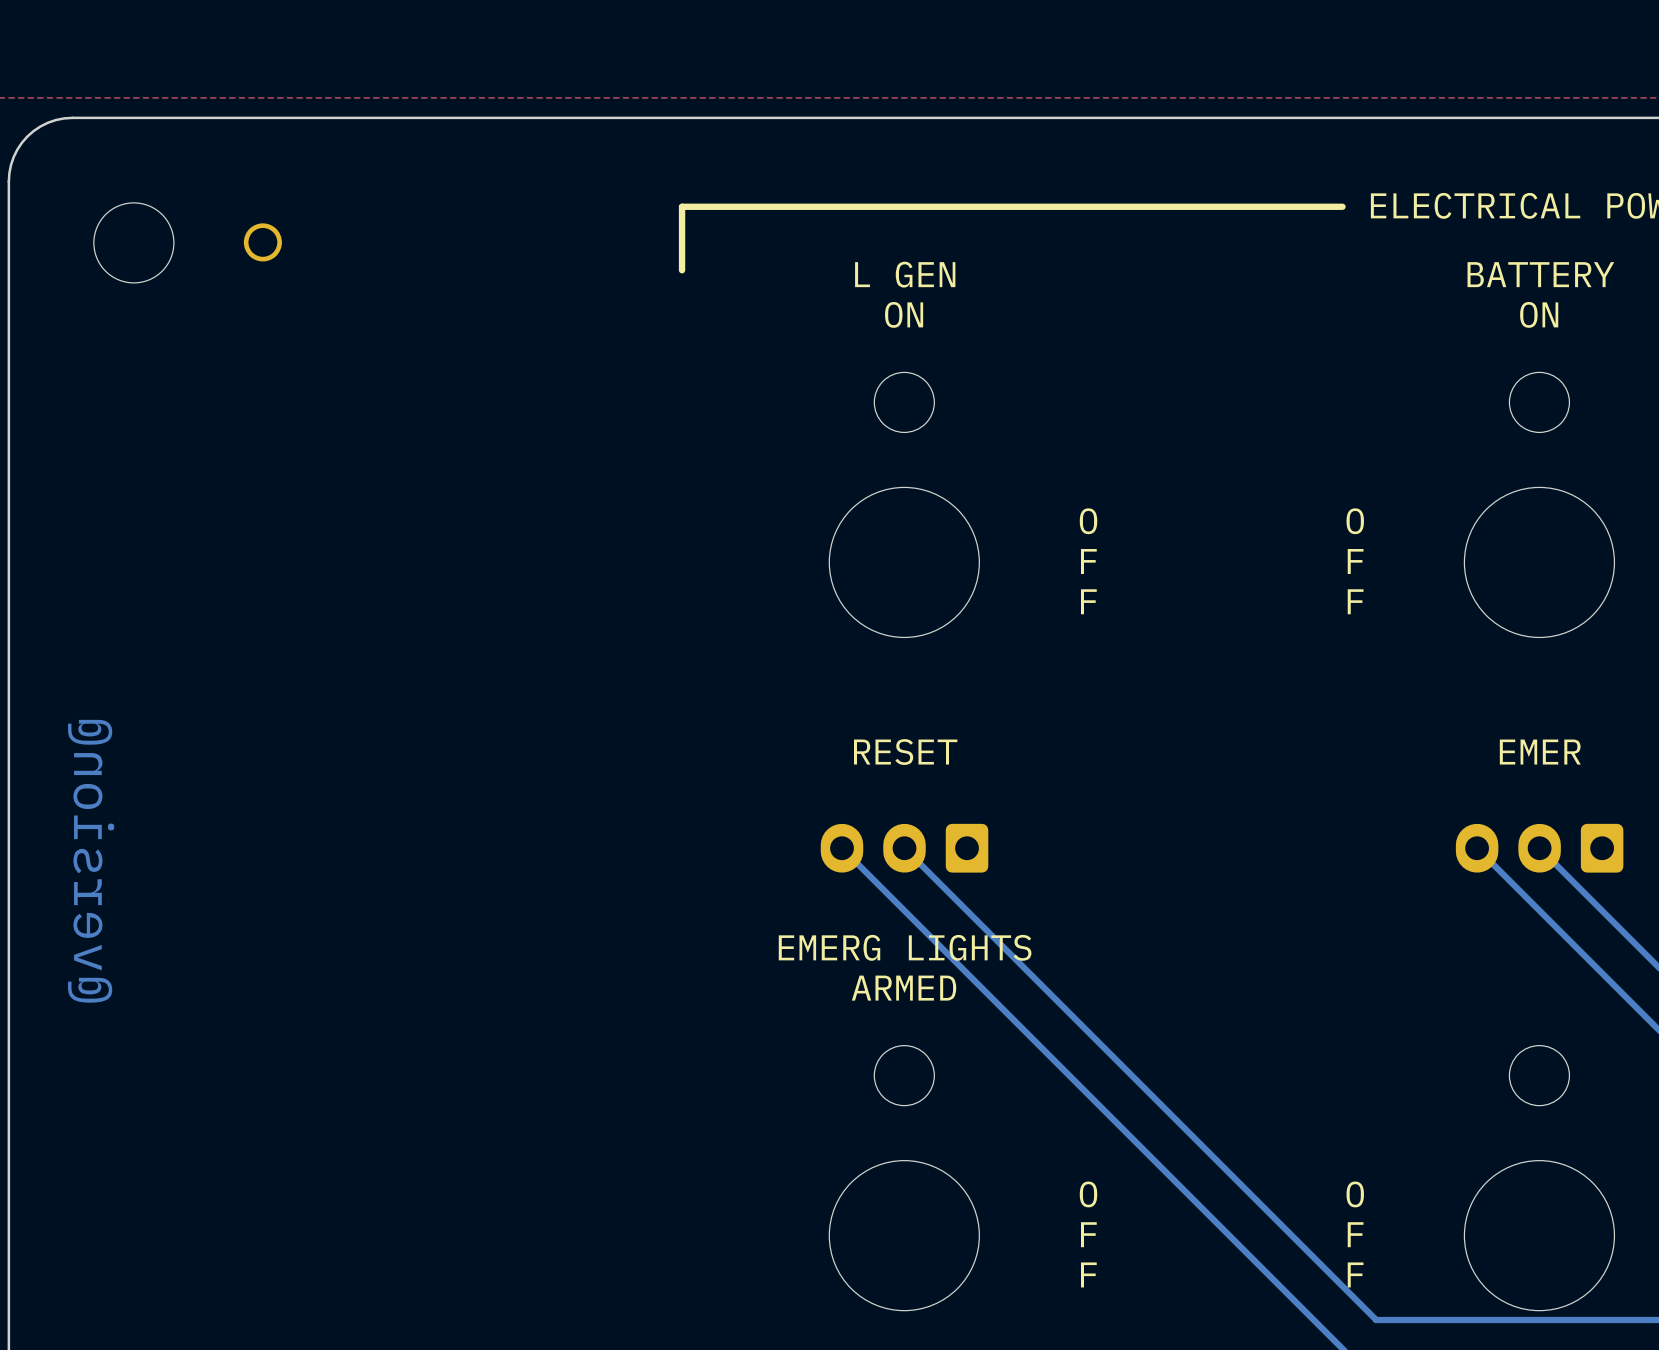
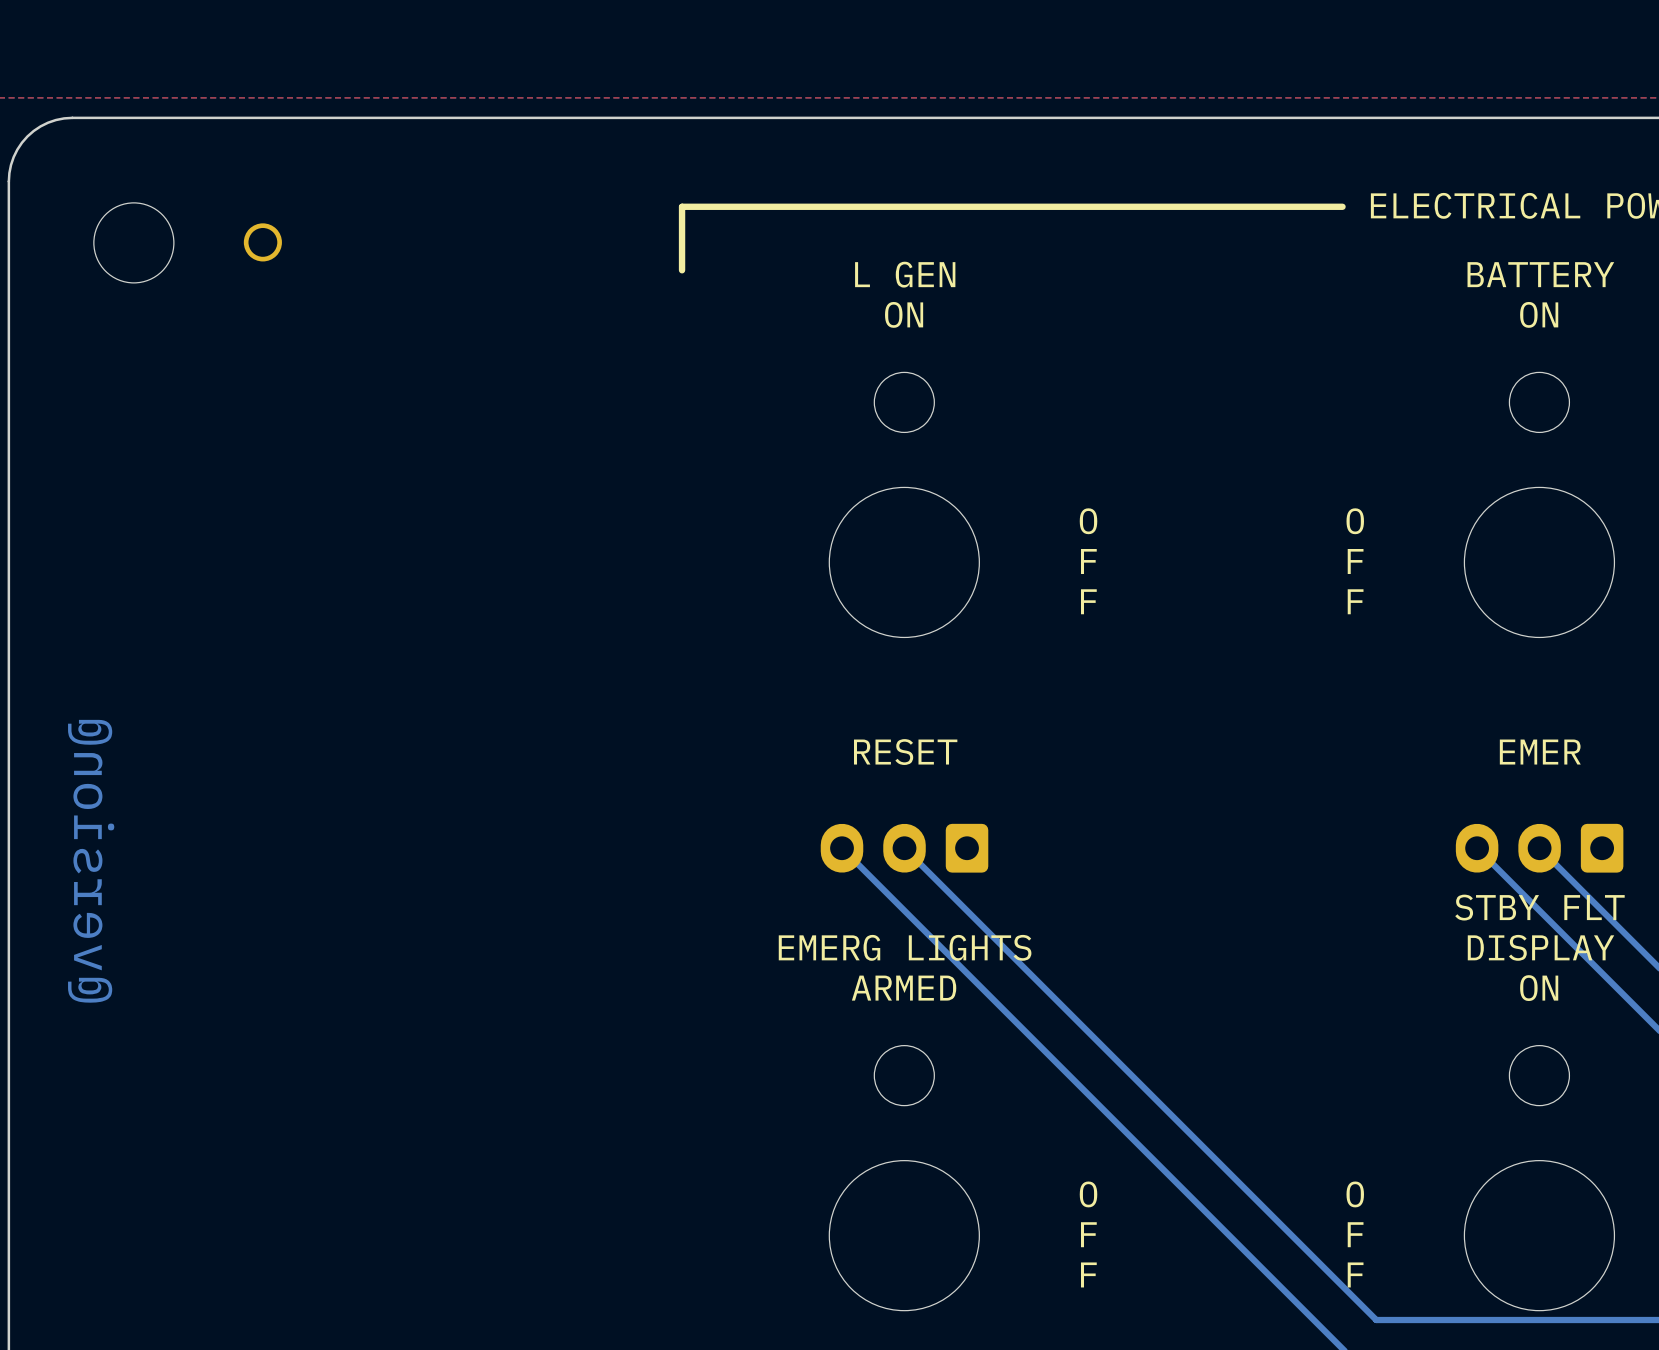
text: none -> STBY FLT (1539, 907)
text: none -> DISPLAY (1541, 947)
text: none -> ON (1539, 988)

